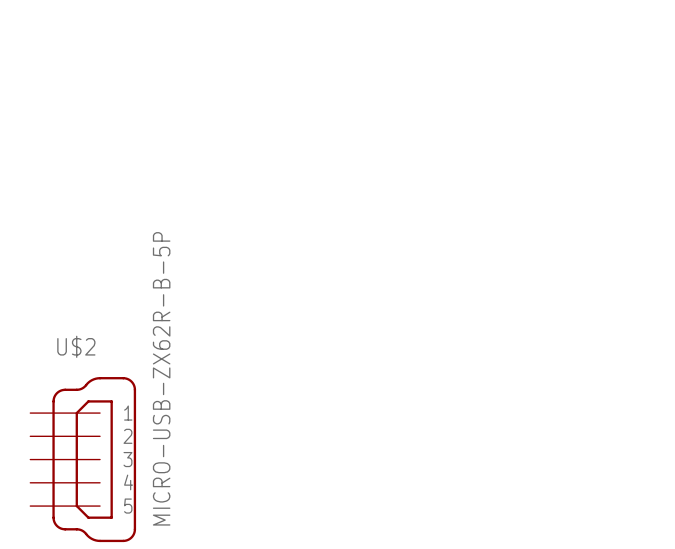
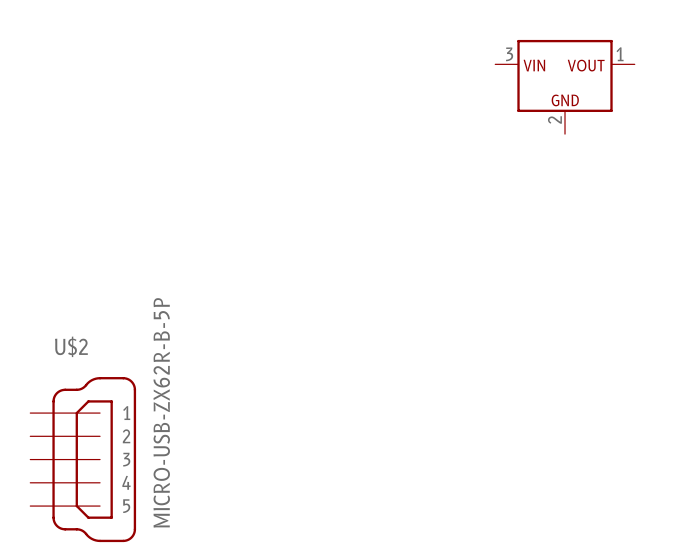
part: none -> (565, 87)

